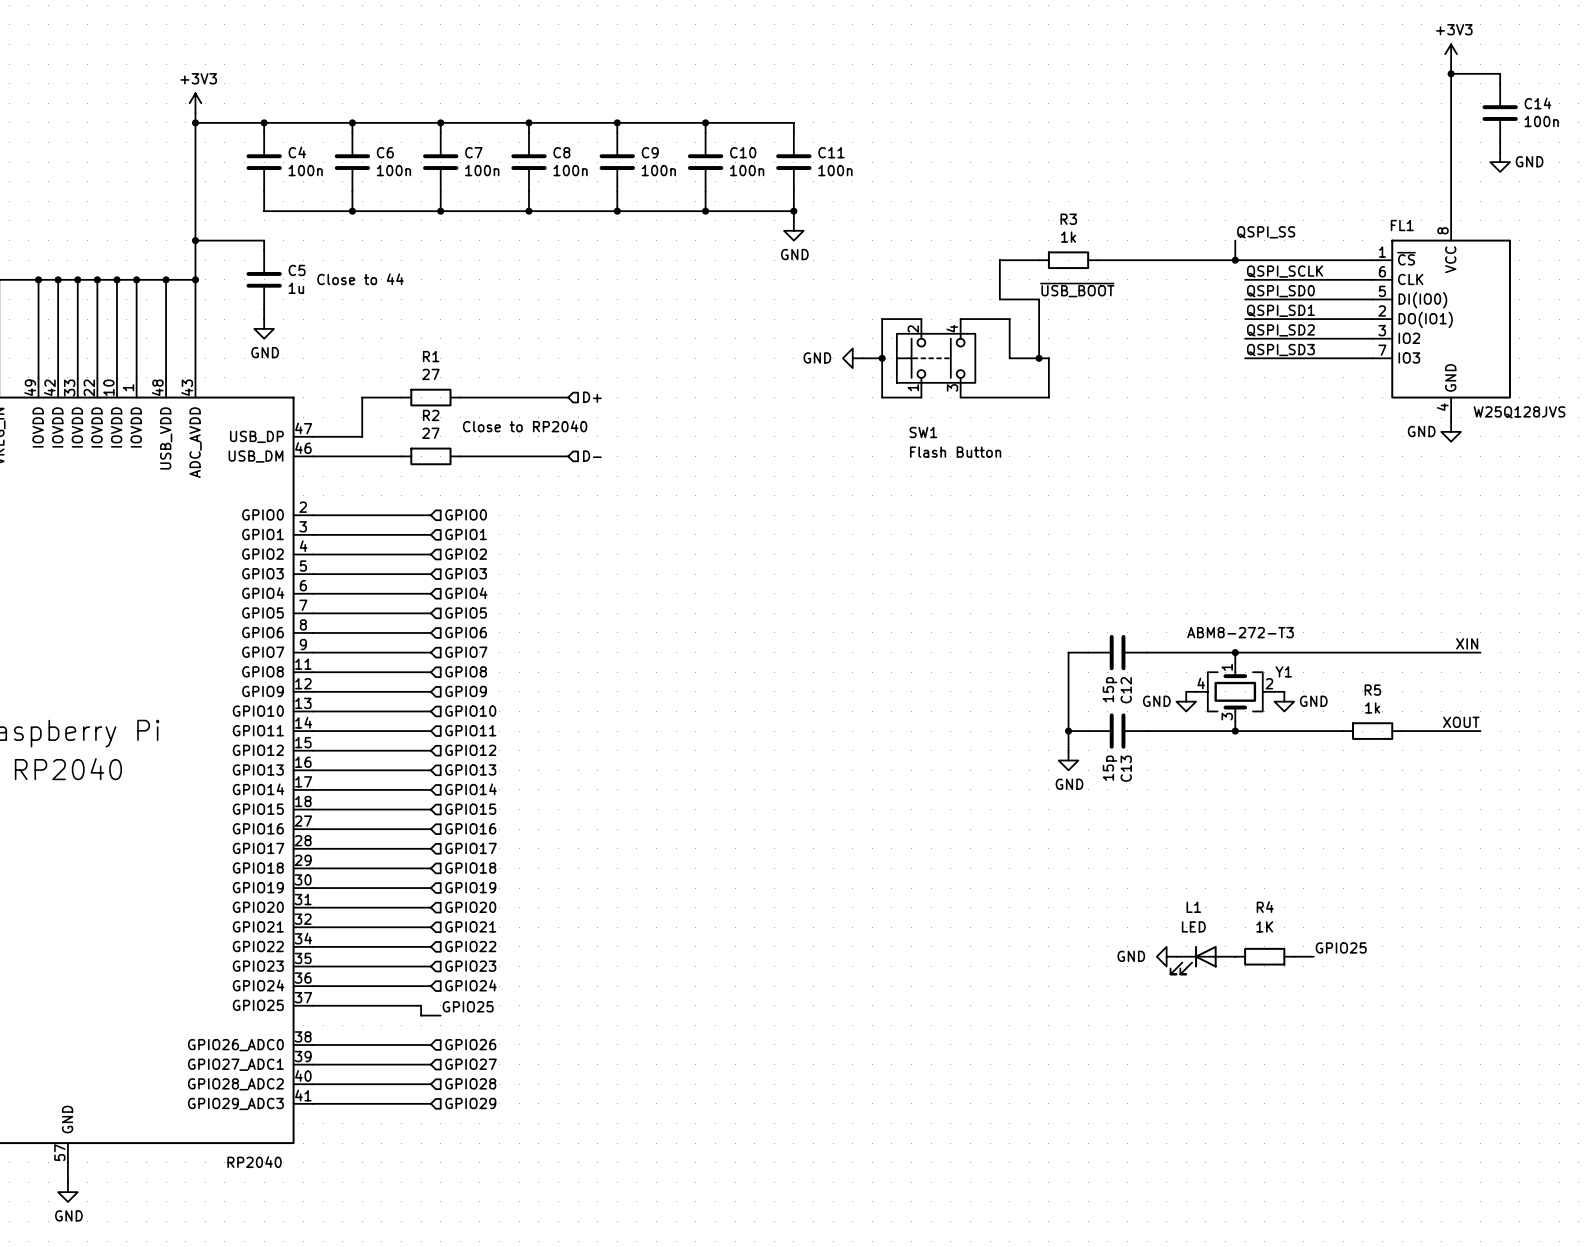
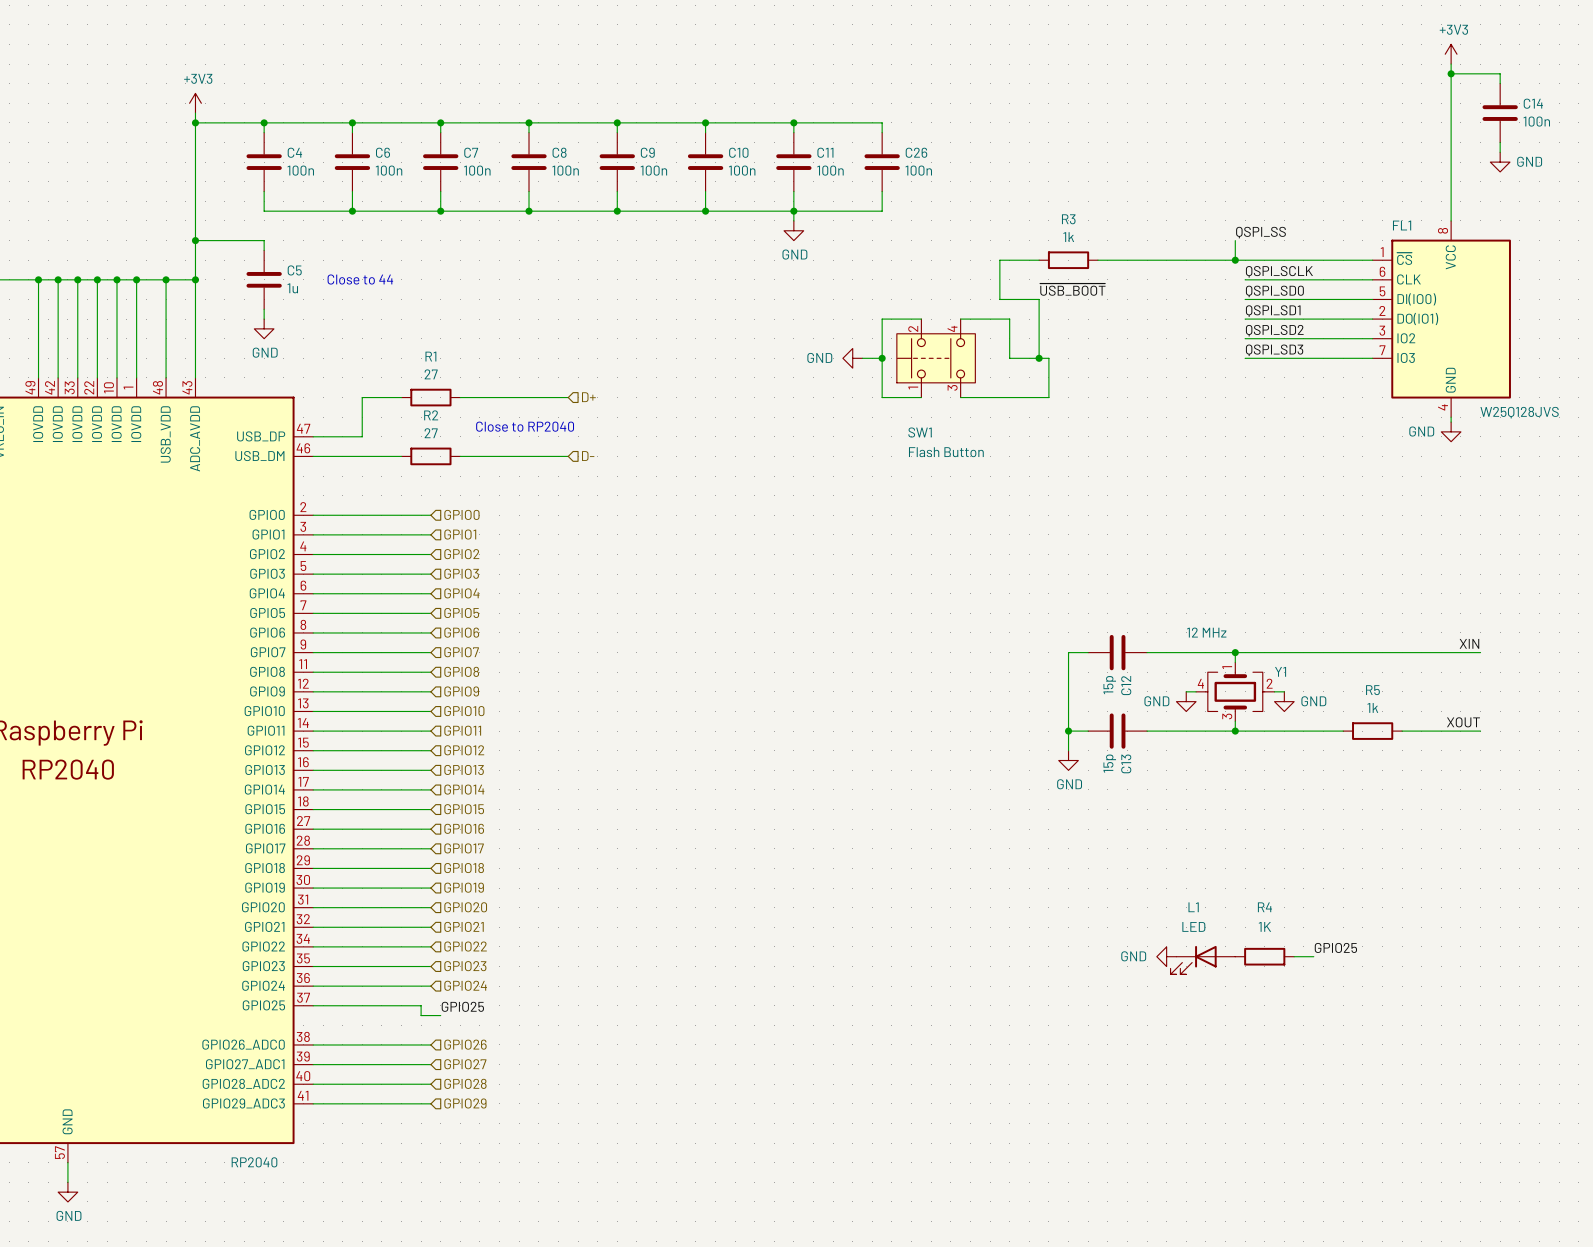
wire: none -> (793, 122) (882, 122) (882, 132)
junction: none -> (793, 122)
C26: none -> 100n (882, 162)
wire: none -> (882, 191) (882, 211) (793, 211)
Y1 value: ABM8-272-T3 (1240, 632) -> 12 MHz (1206, 632)

